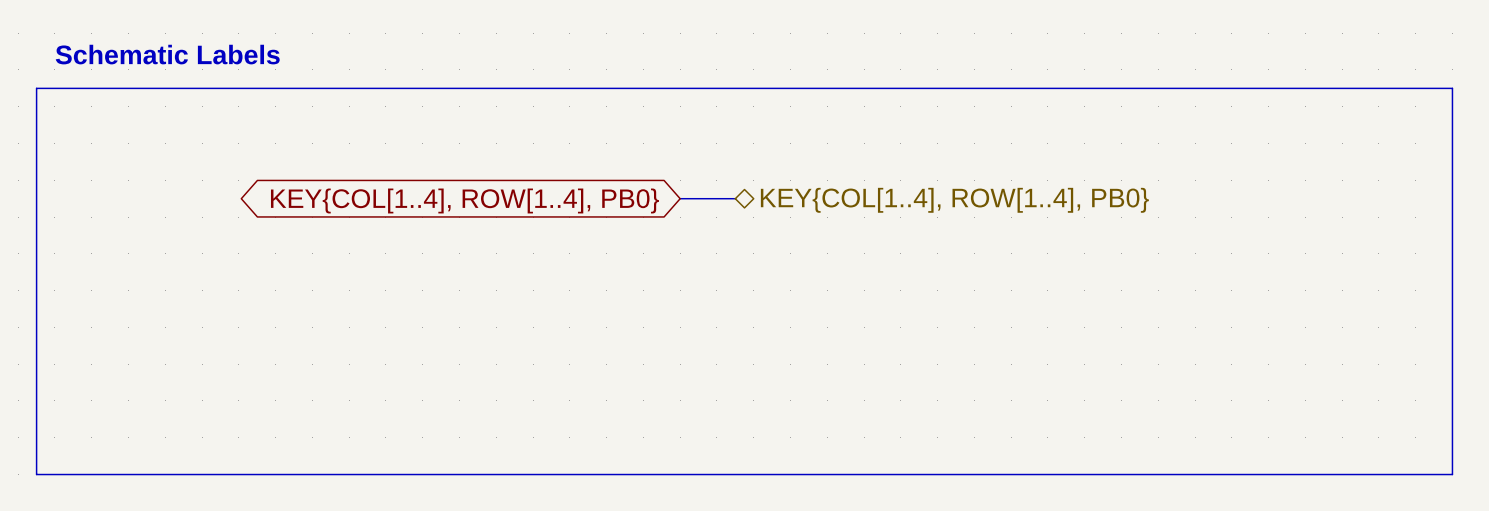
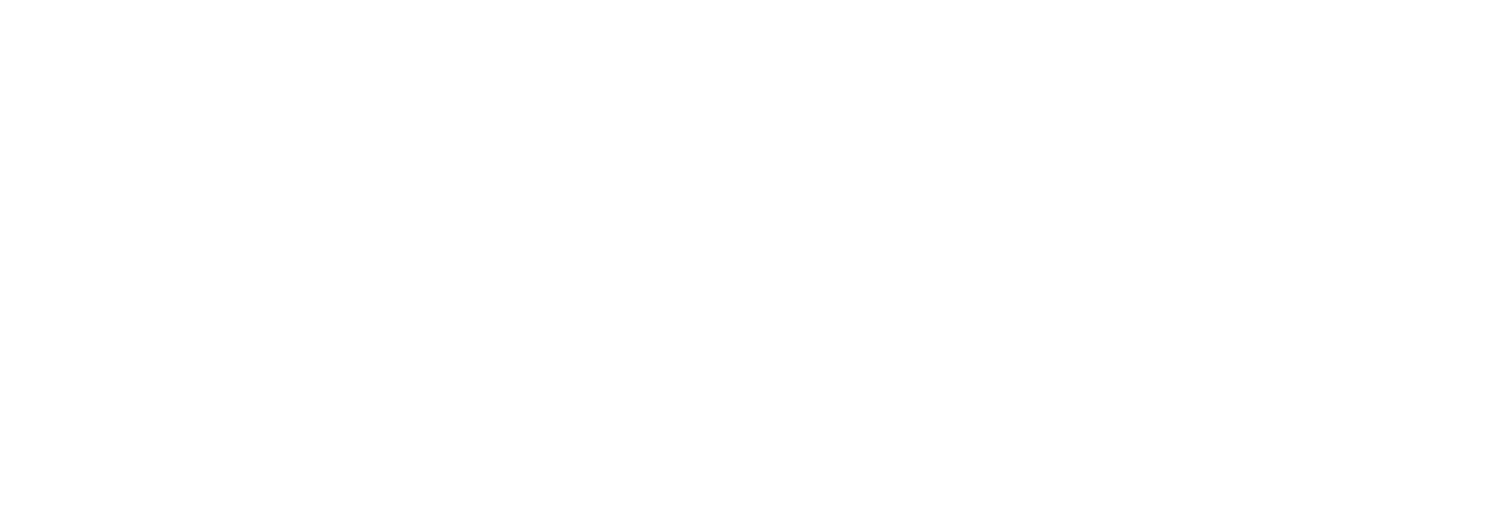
text: Schematic Labels (167, 54) -> none
line: (36, 88) (1452, 88) (1452, 474) (36, 474) (36, 88) -> none
bus: (680, 198) (735, 198) -> none
global label: KEY{COL[1..4], ROW[1..4], PB0} (464, 200) -> none
hierarchical label: KEY{COL[1..4], ROW[1..4], PB0} (954, 200) -> none

